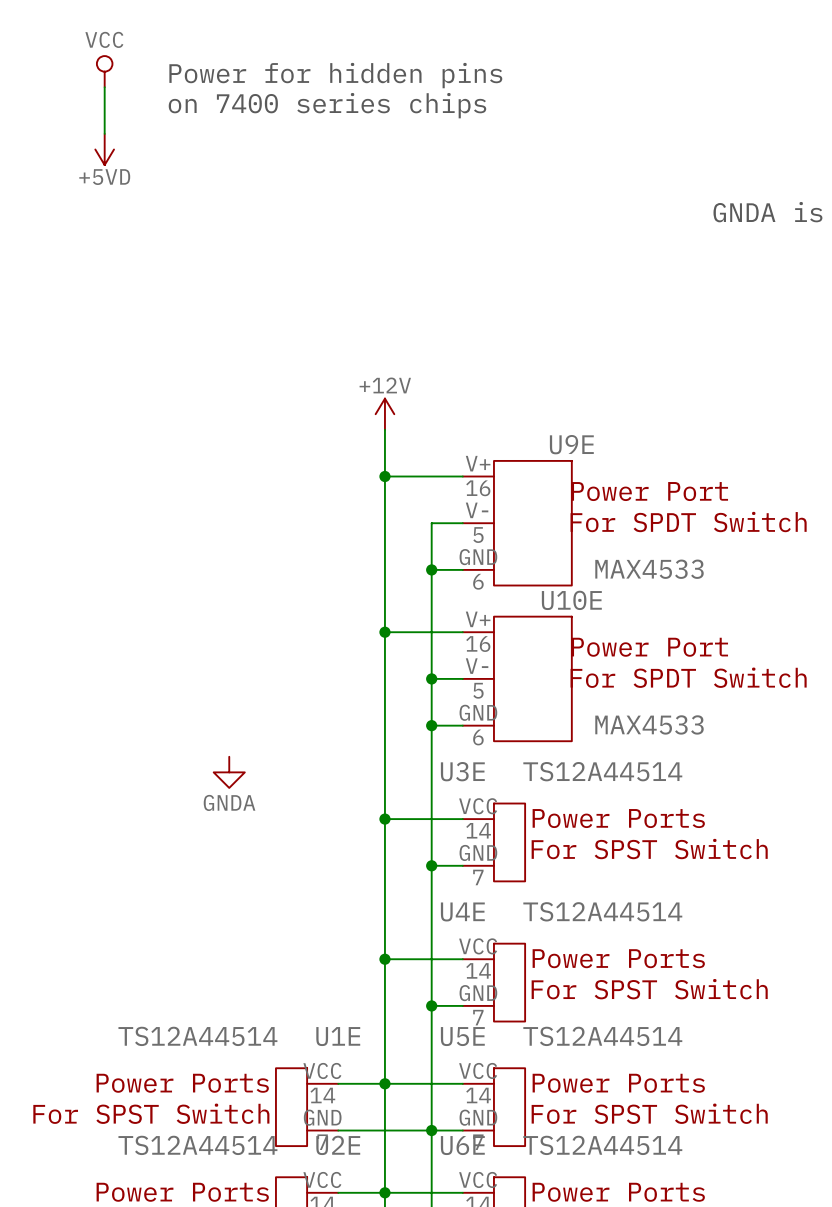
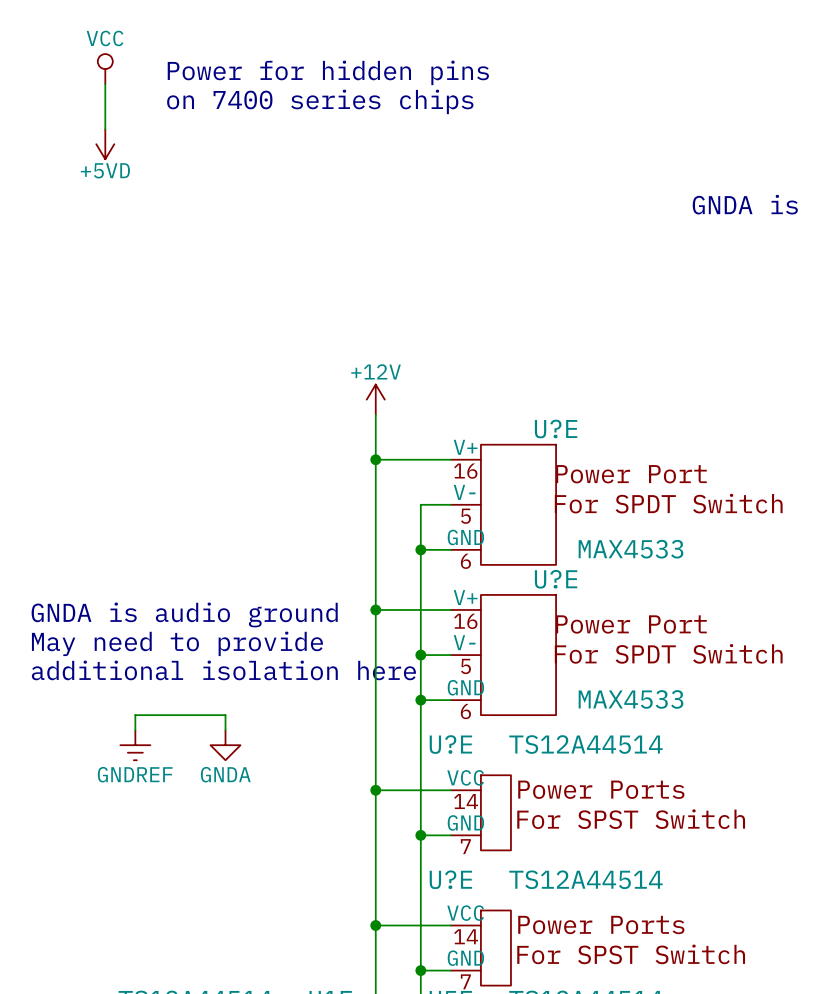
U9E name: U9E (571, 444) -> U?E (556, 429)
U10E name: U10E (571, 600) -> U?E (556, 579)
text: none -> GNDA is audio ground (184, 614)
text: none -> May need to provide (177, 643)
text: none -> additional isolation here (223, 670)
wire: none -> (135, 730) (135, 715) (225, 715) (225, 730)
U3E name: U3E (462, 771) -> U?E (450, 744)
power symbol: none -> GNDREF (135, 745)
U4E name: U4E (462, 911) -> U?E (450, 879)

